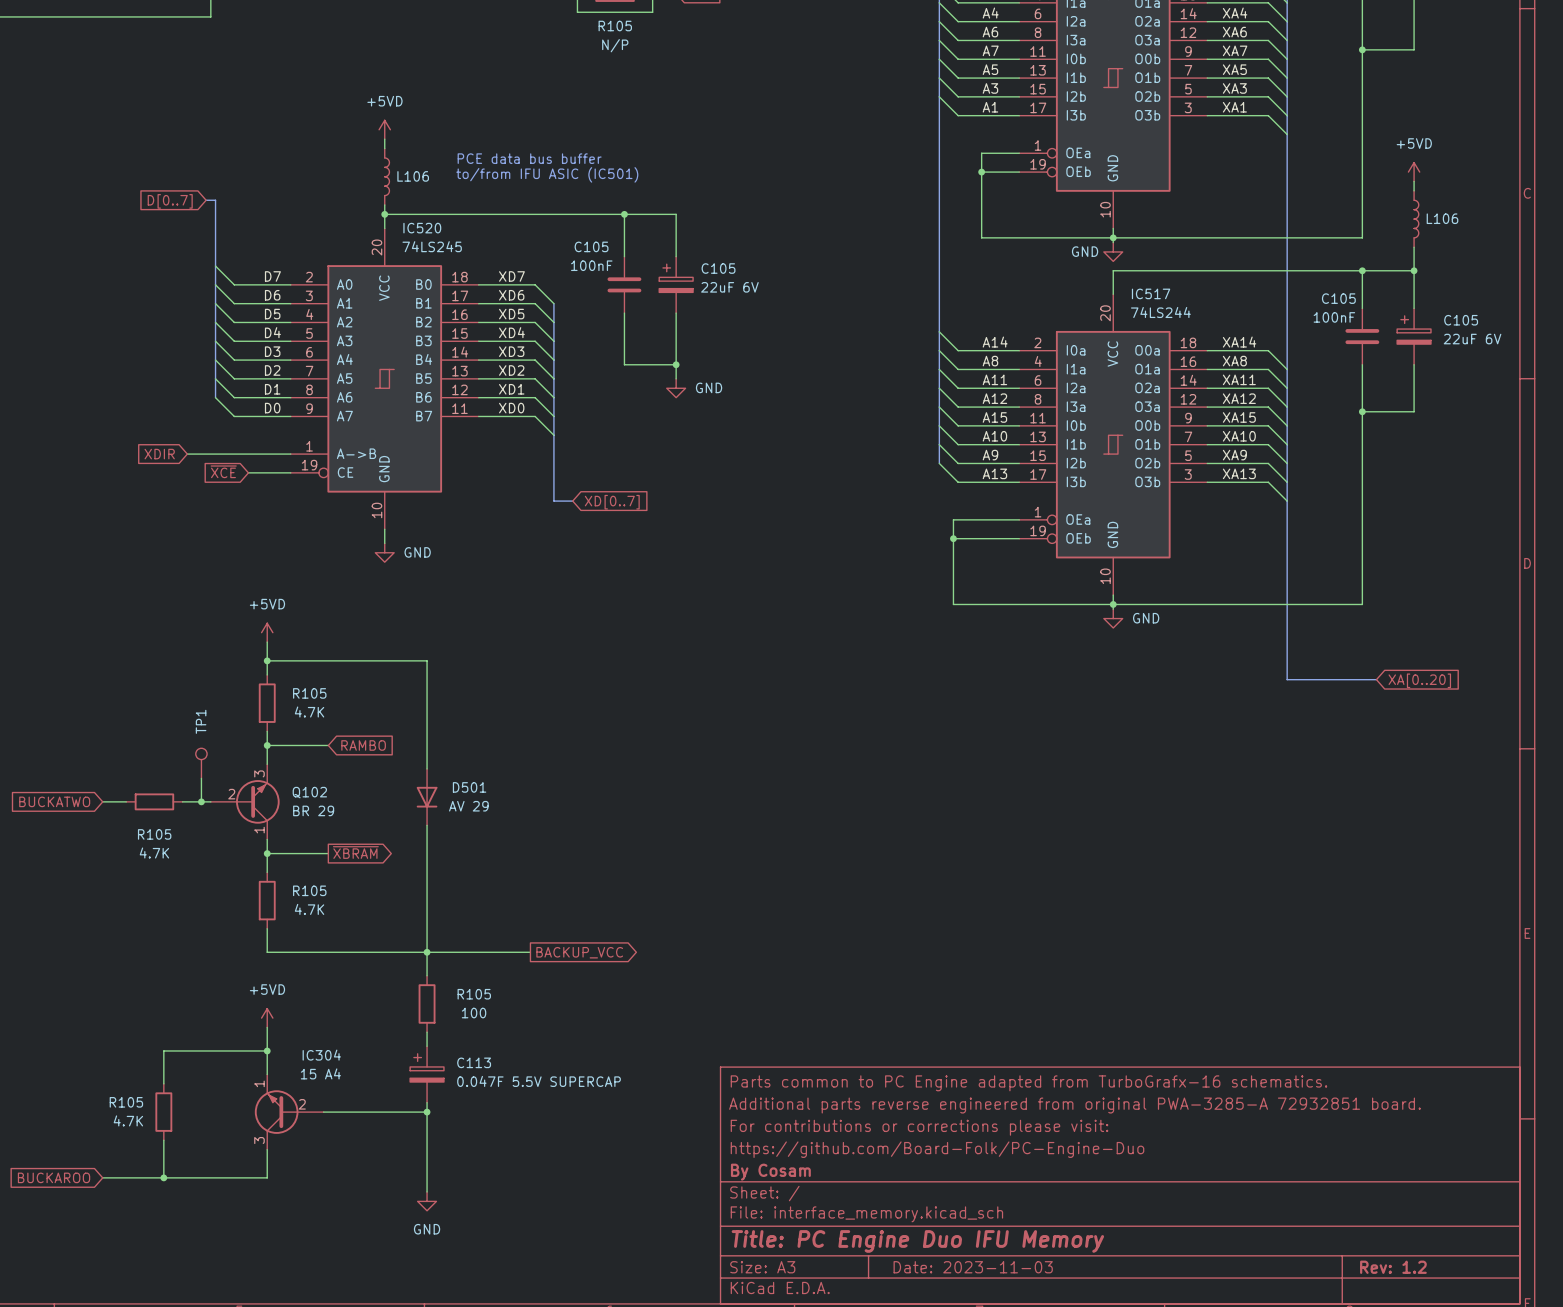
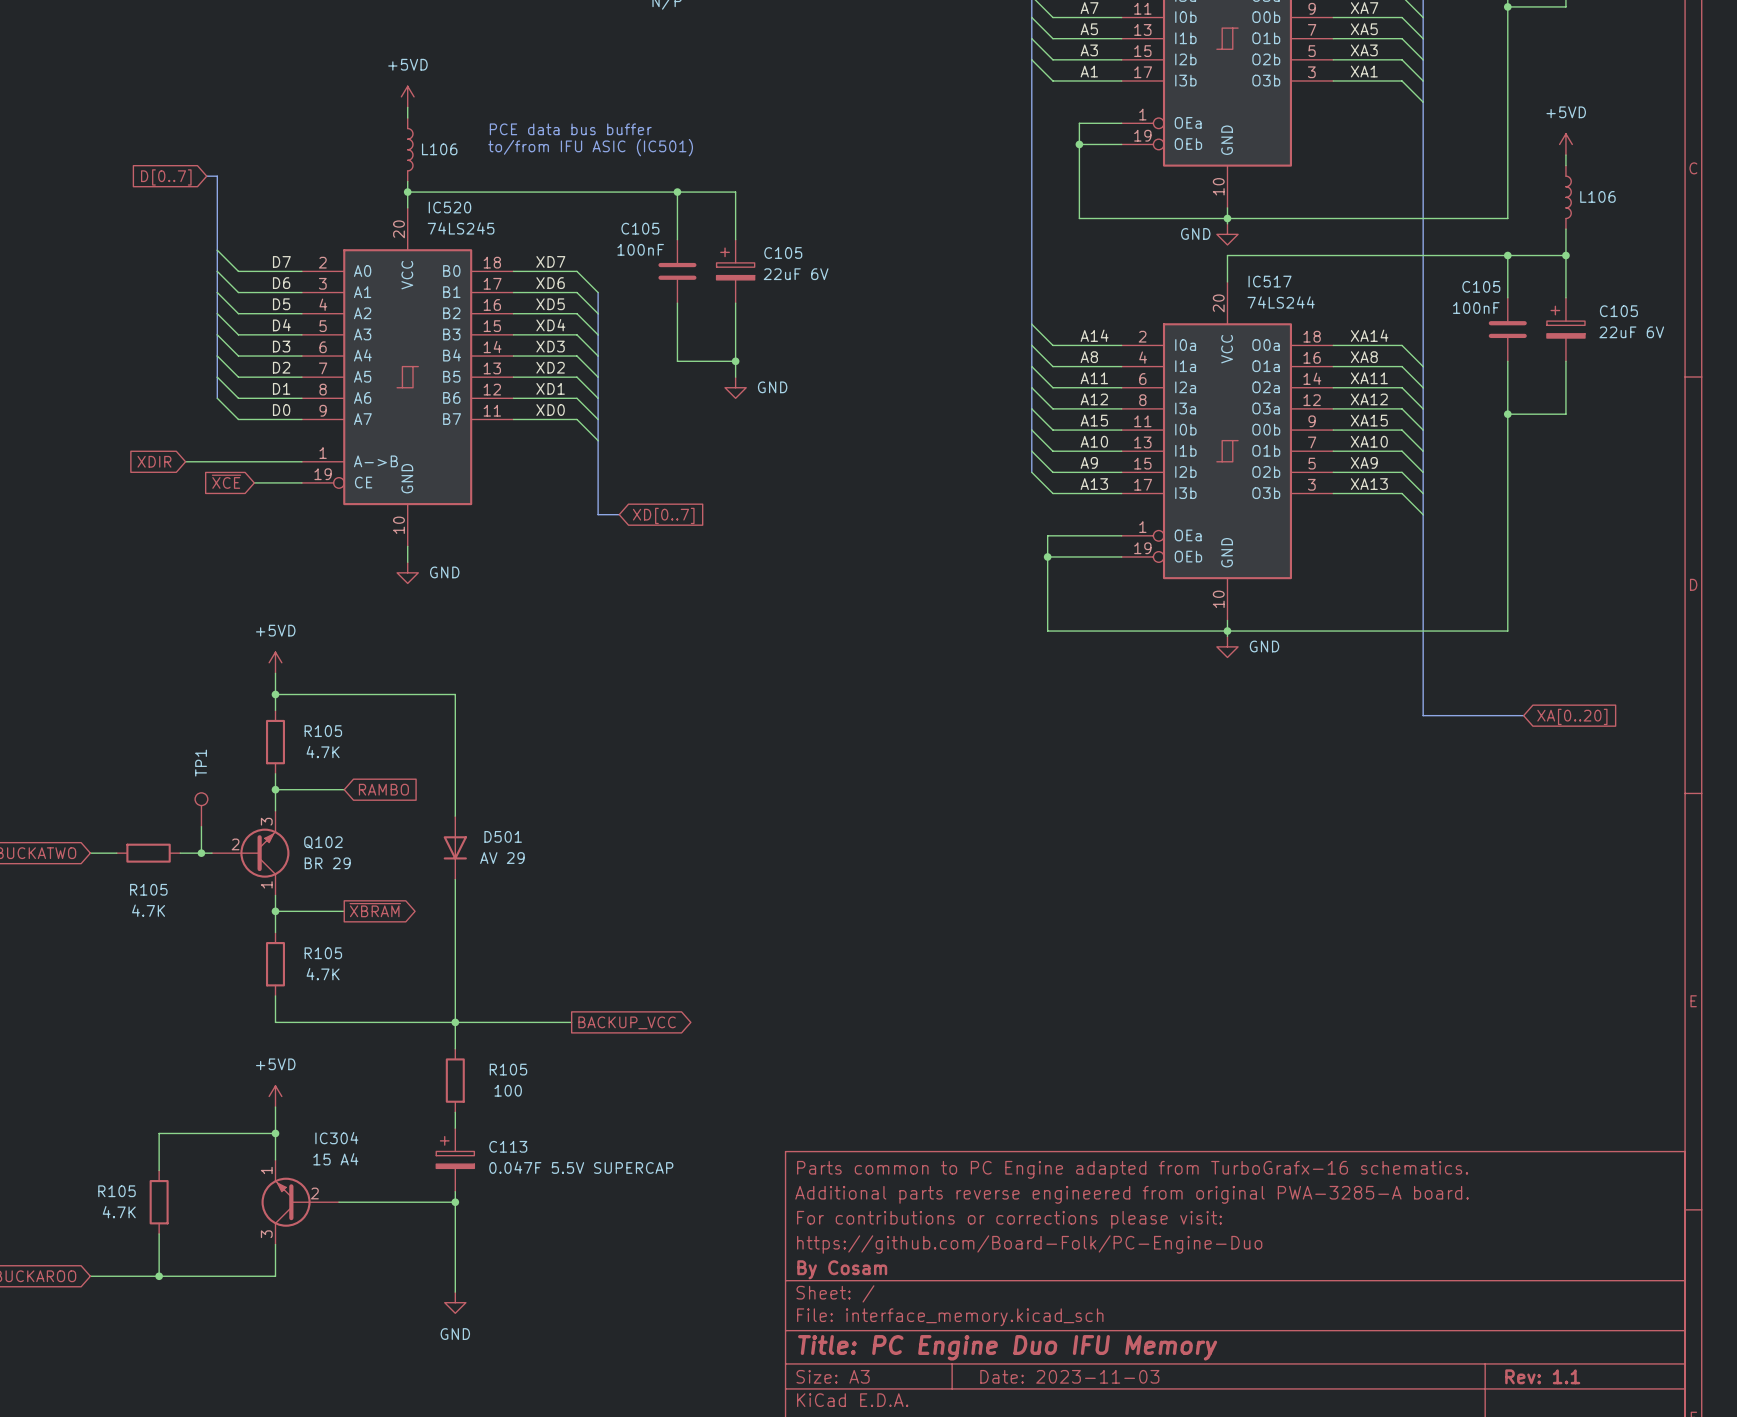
title block: Additional parts reverse engineered from original PWA-3285-A 72932851 board. (1074, 1105) -> Additional parts reverse engineered from original PWA-3285-A board. (1132, 1194)
title block: Rev: 1.2 (1393, 1267) -> Rev: 1.1 (1542, 1376)

